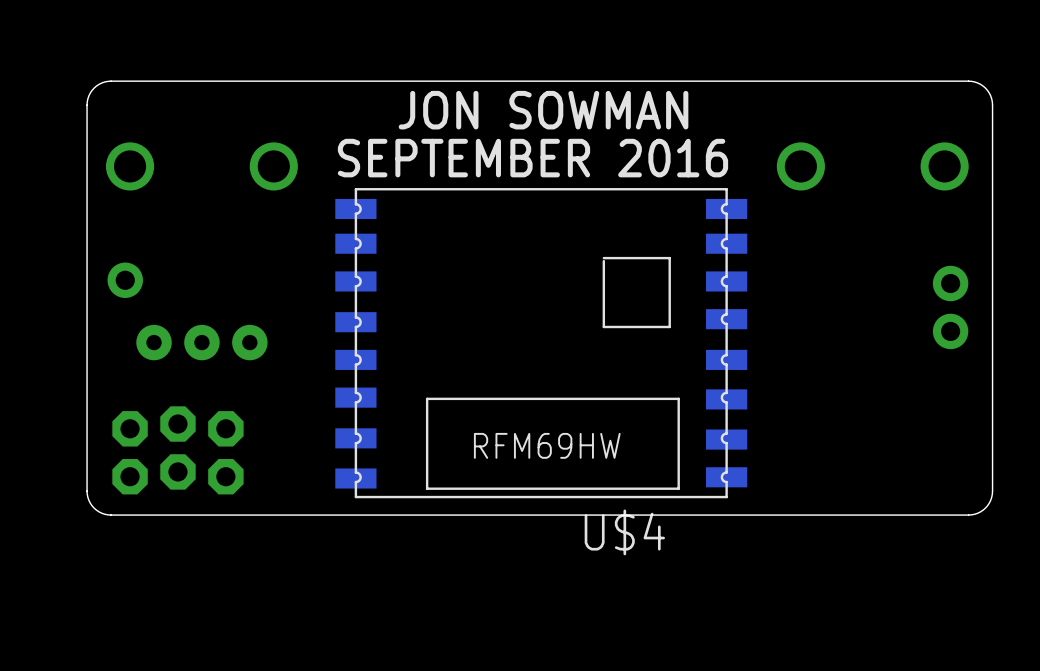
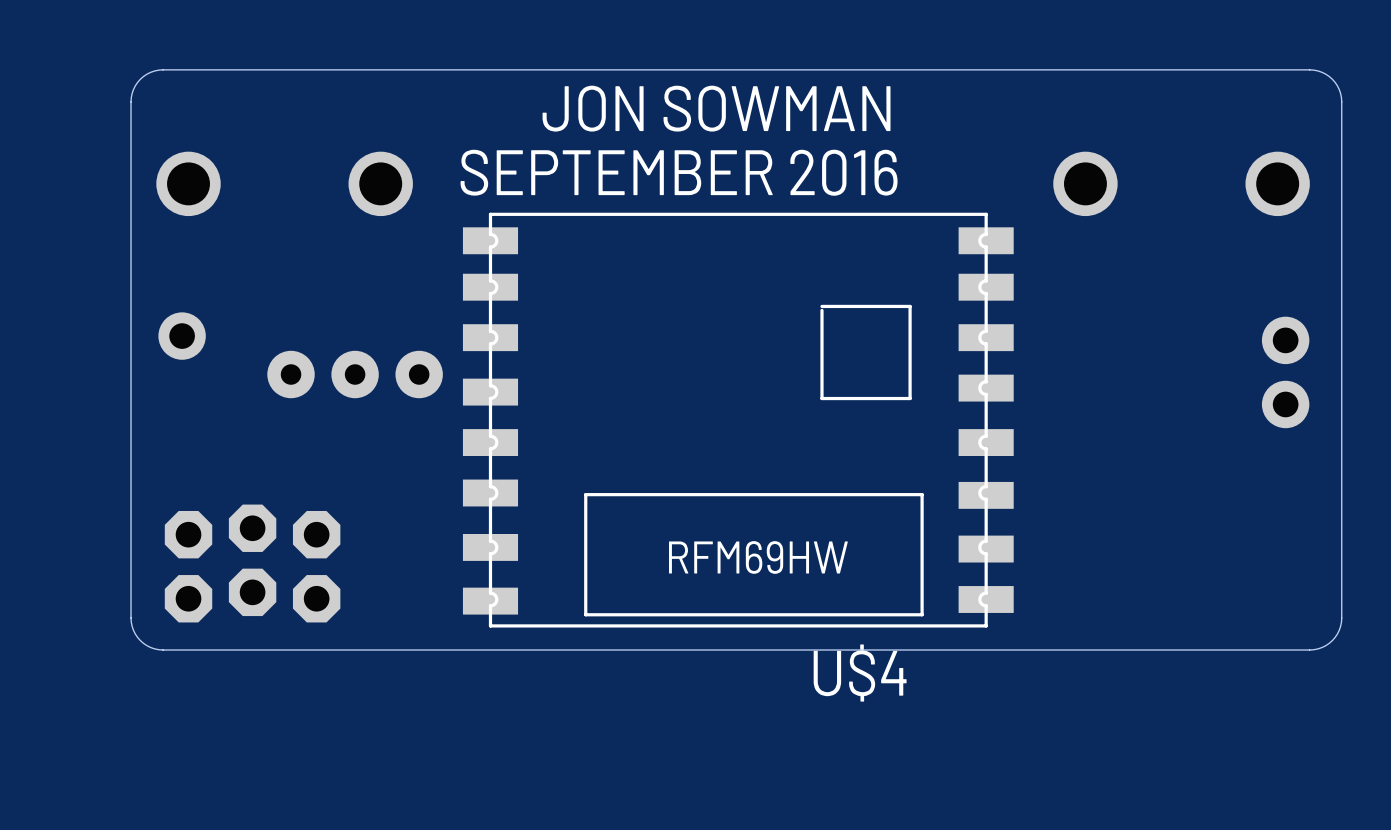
part position: (201, 342) -> (355, 374)

